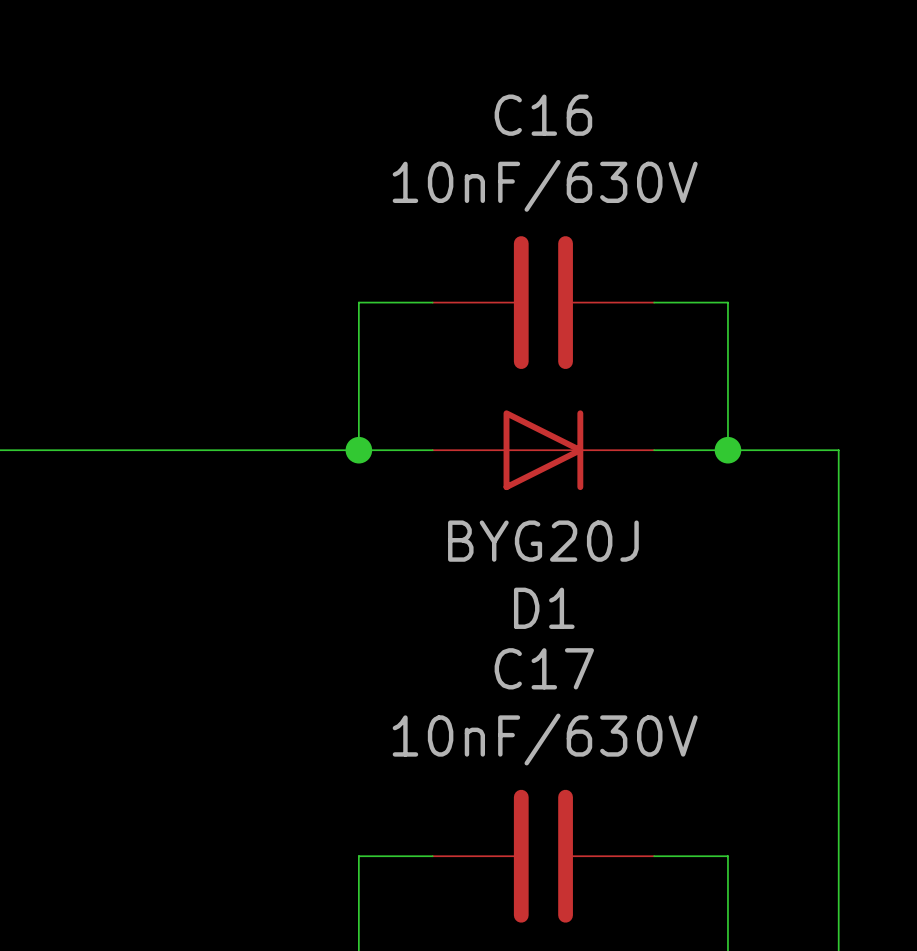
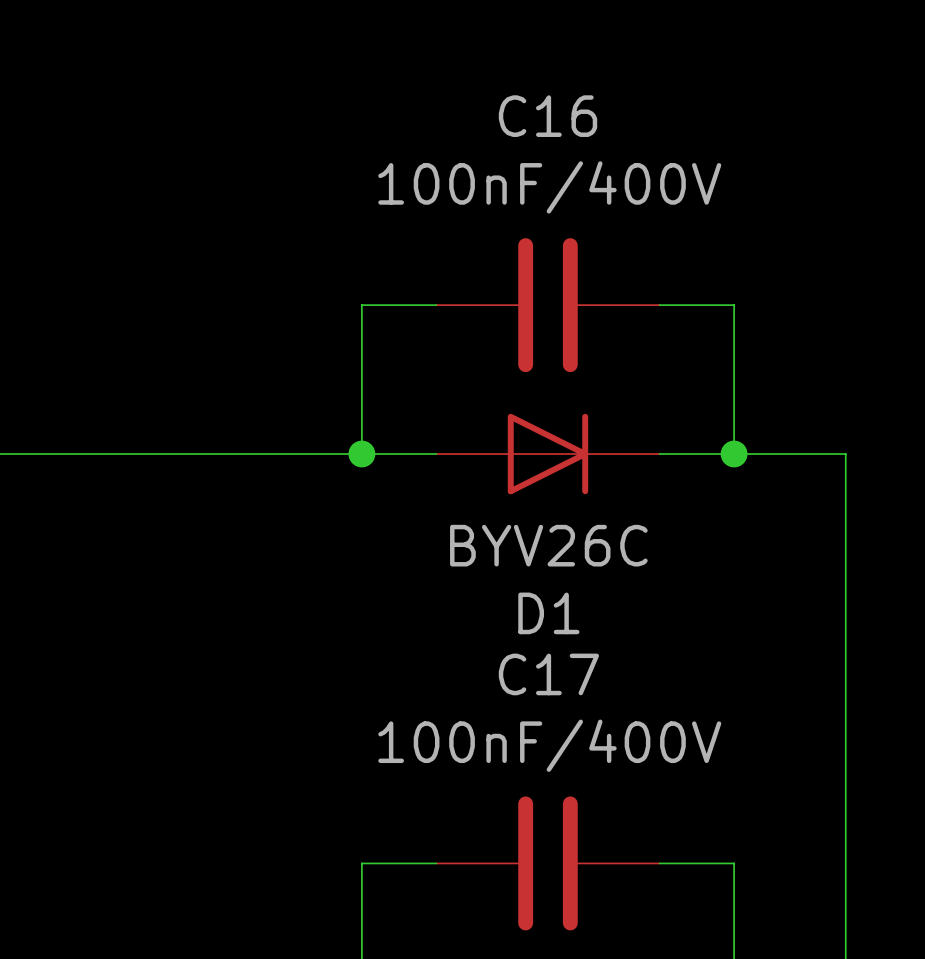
C16 value: 10nF/630V (545, 185) -> 100nF/400V (549, 187)
D1 value: BYG20J (543, 541) -> BYV26C (548, 545)
C17 value: 10nF/630V (545, 739) -> 100nF/400V (549, 745)

